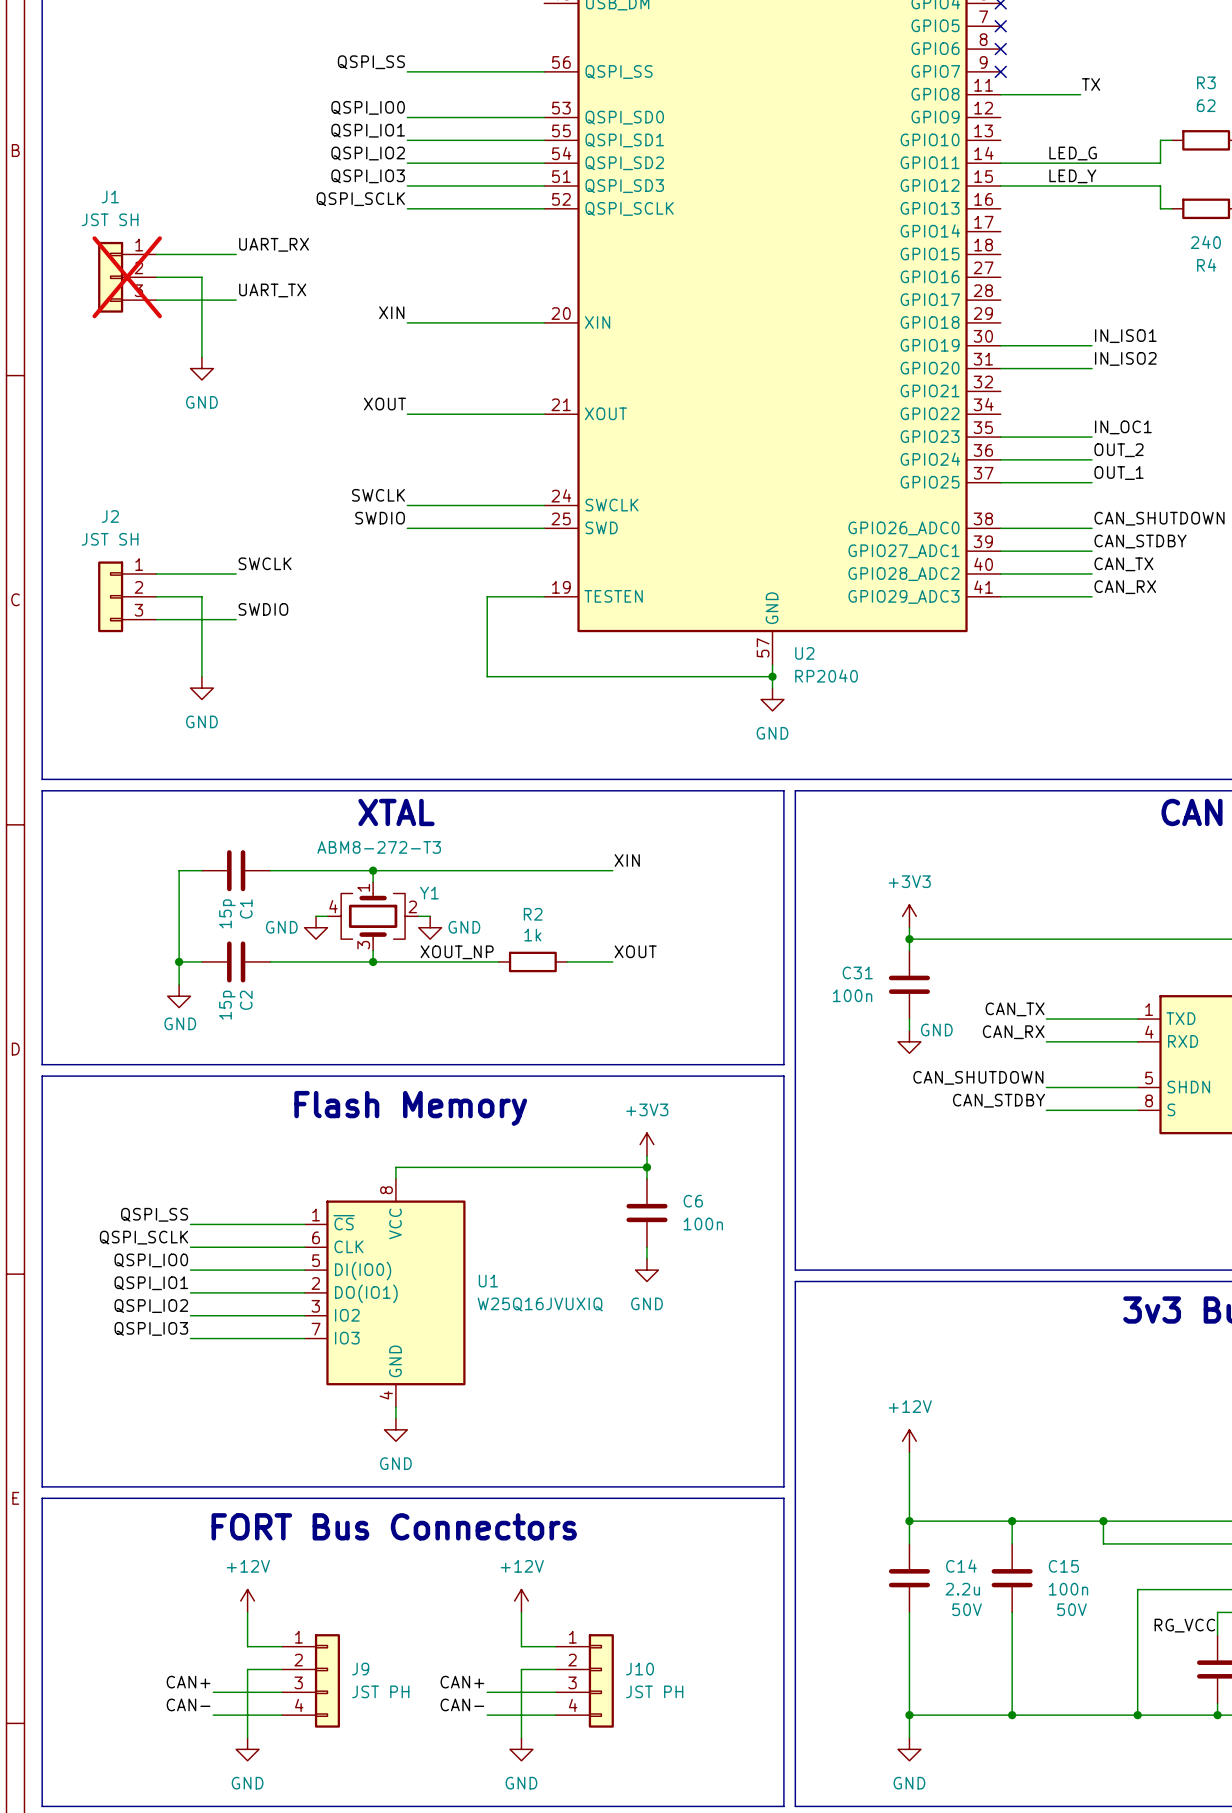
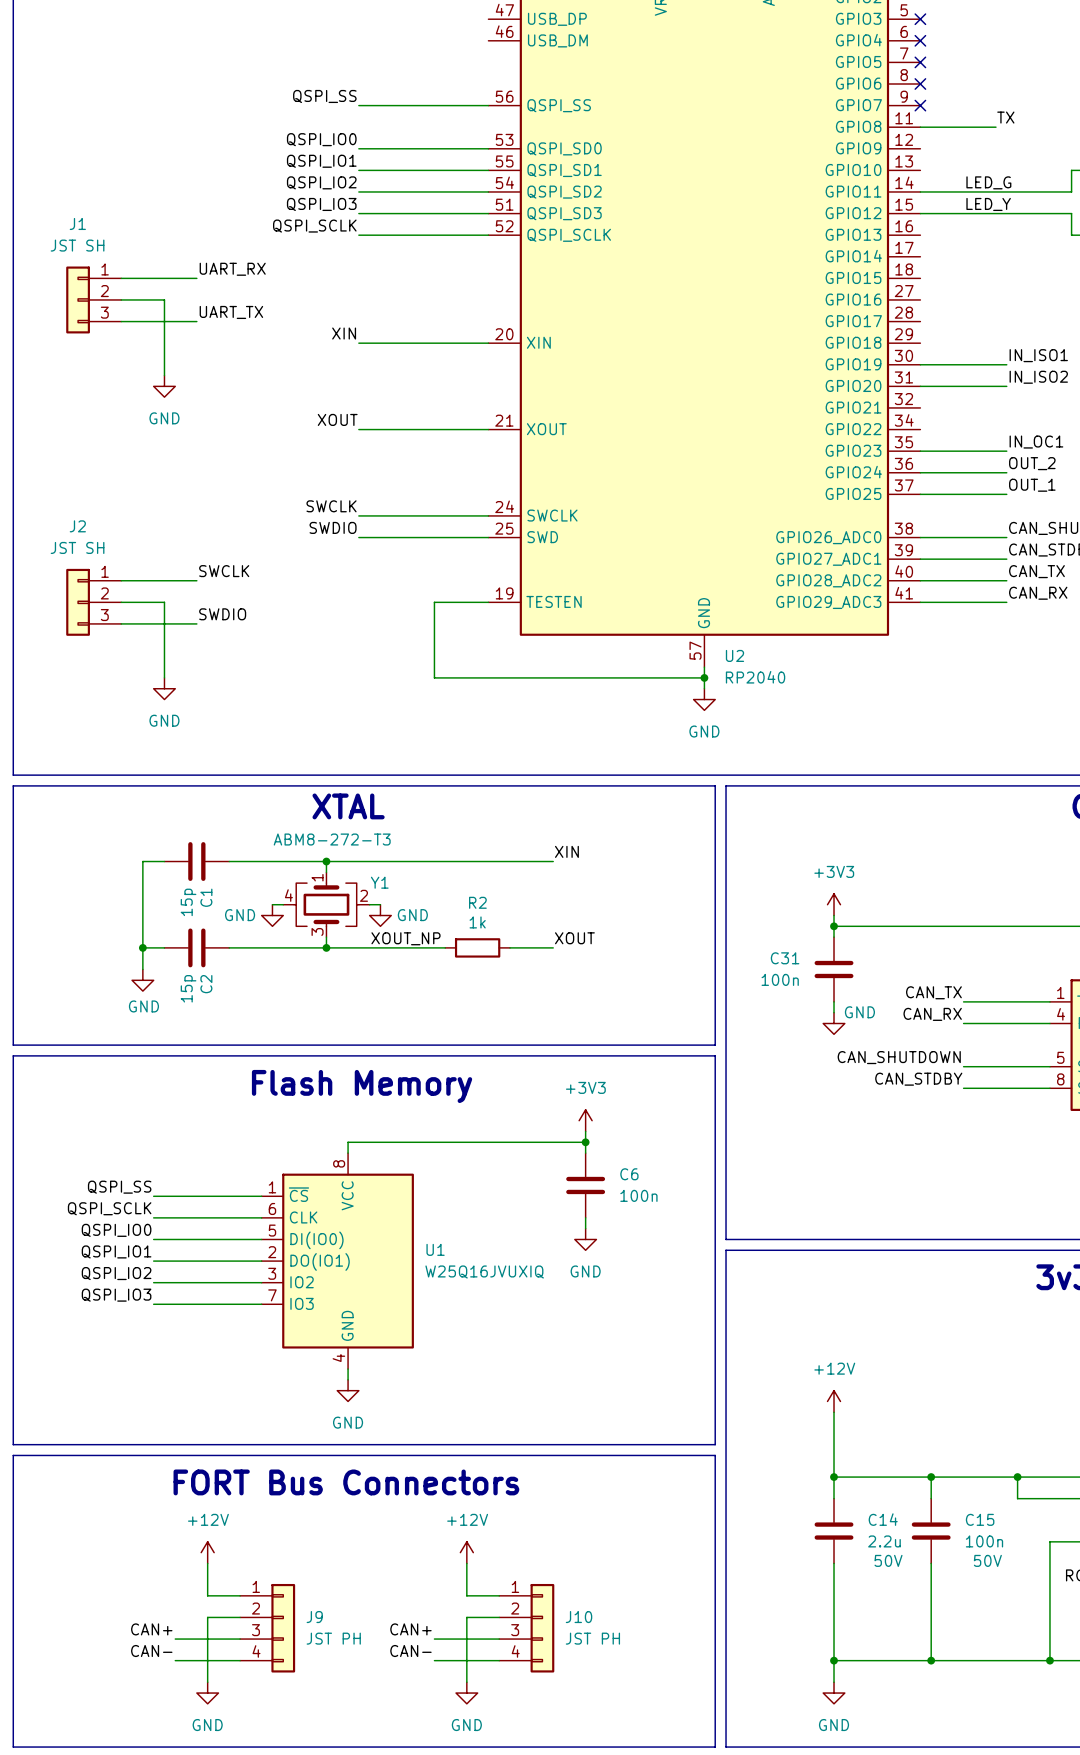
J1 do-not-place cross: (127, 277) -> none

